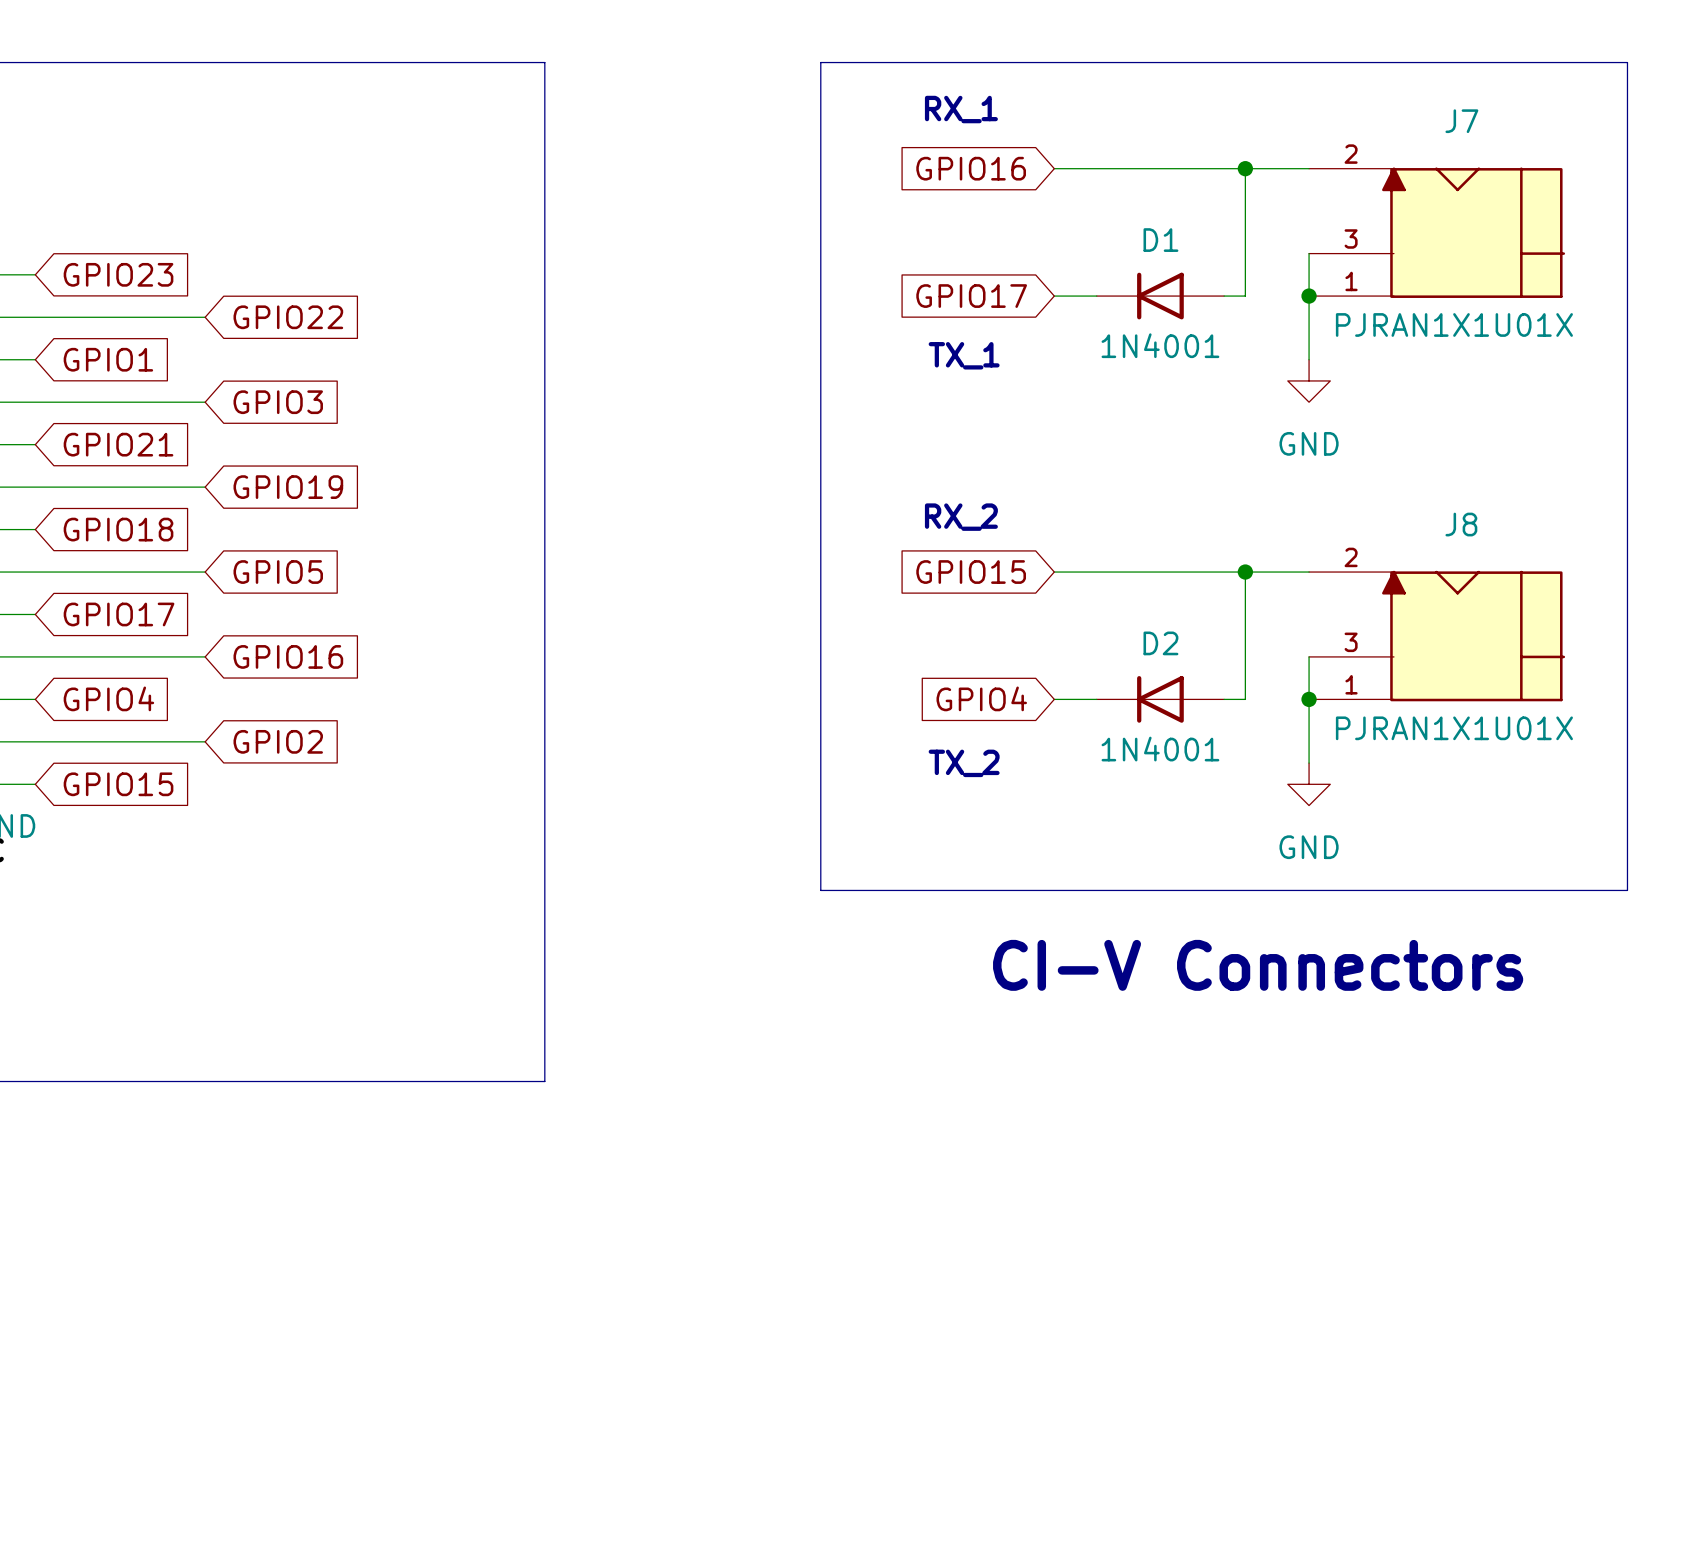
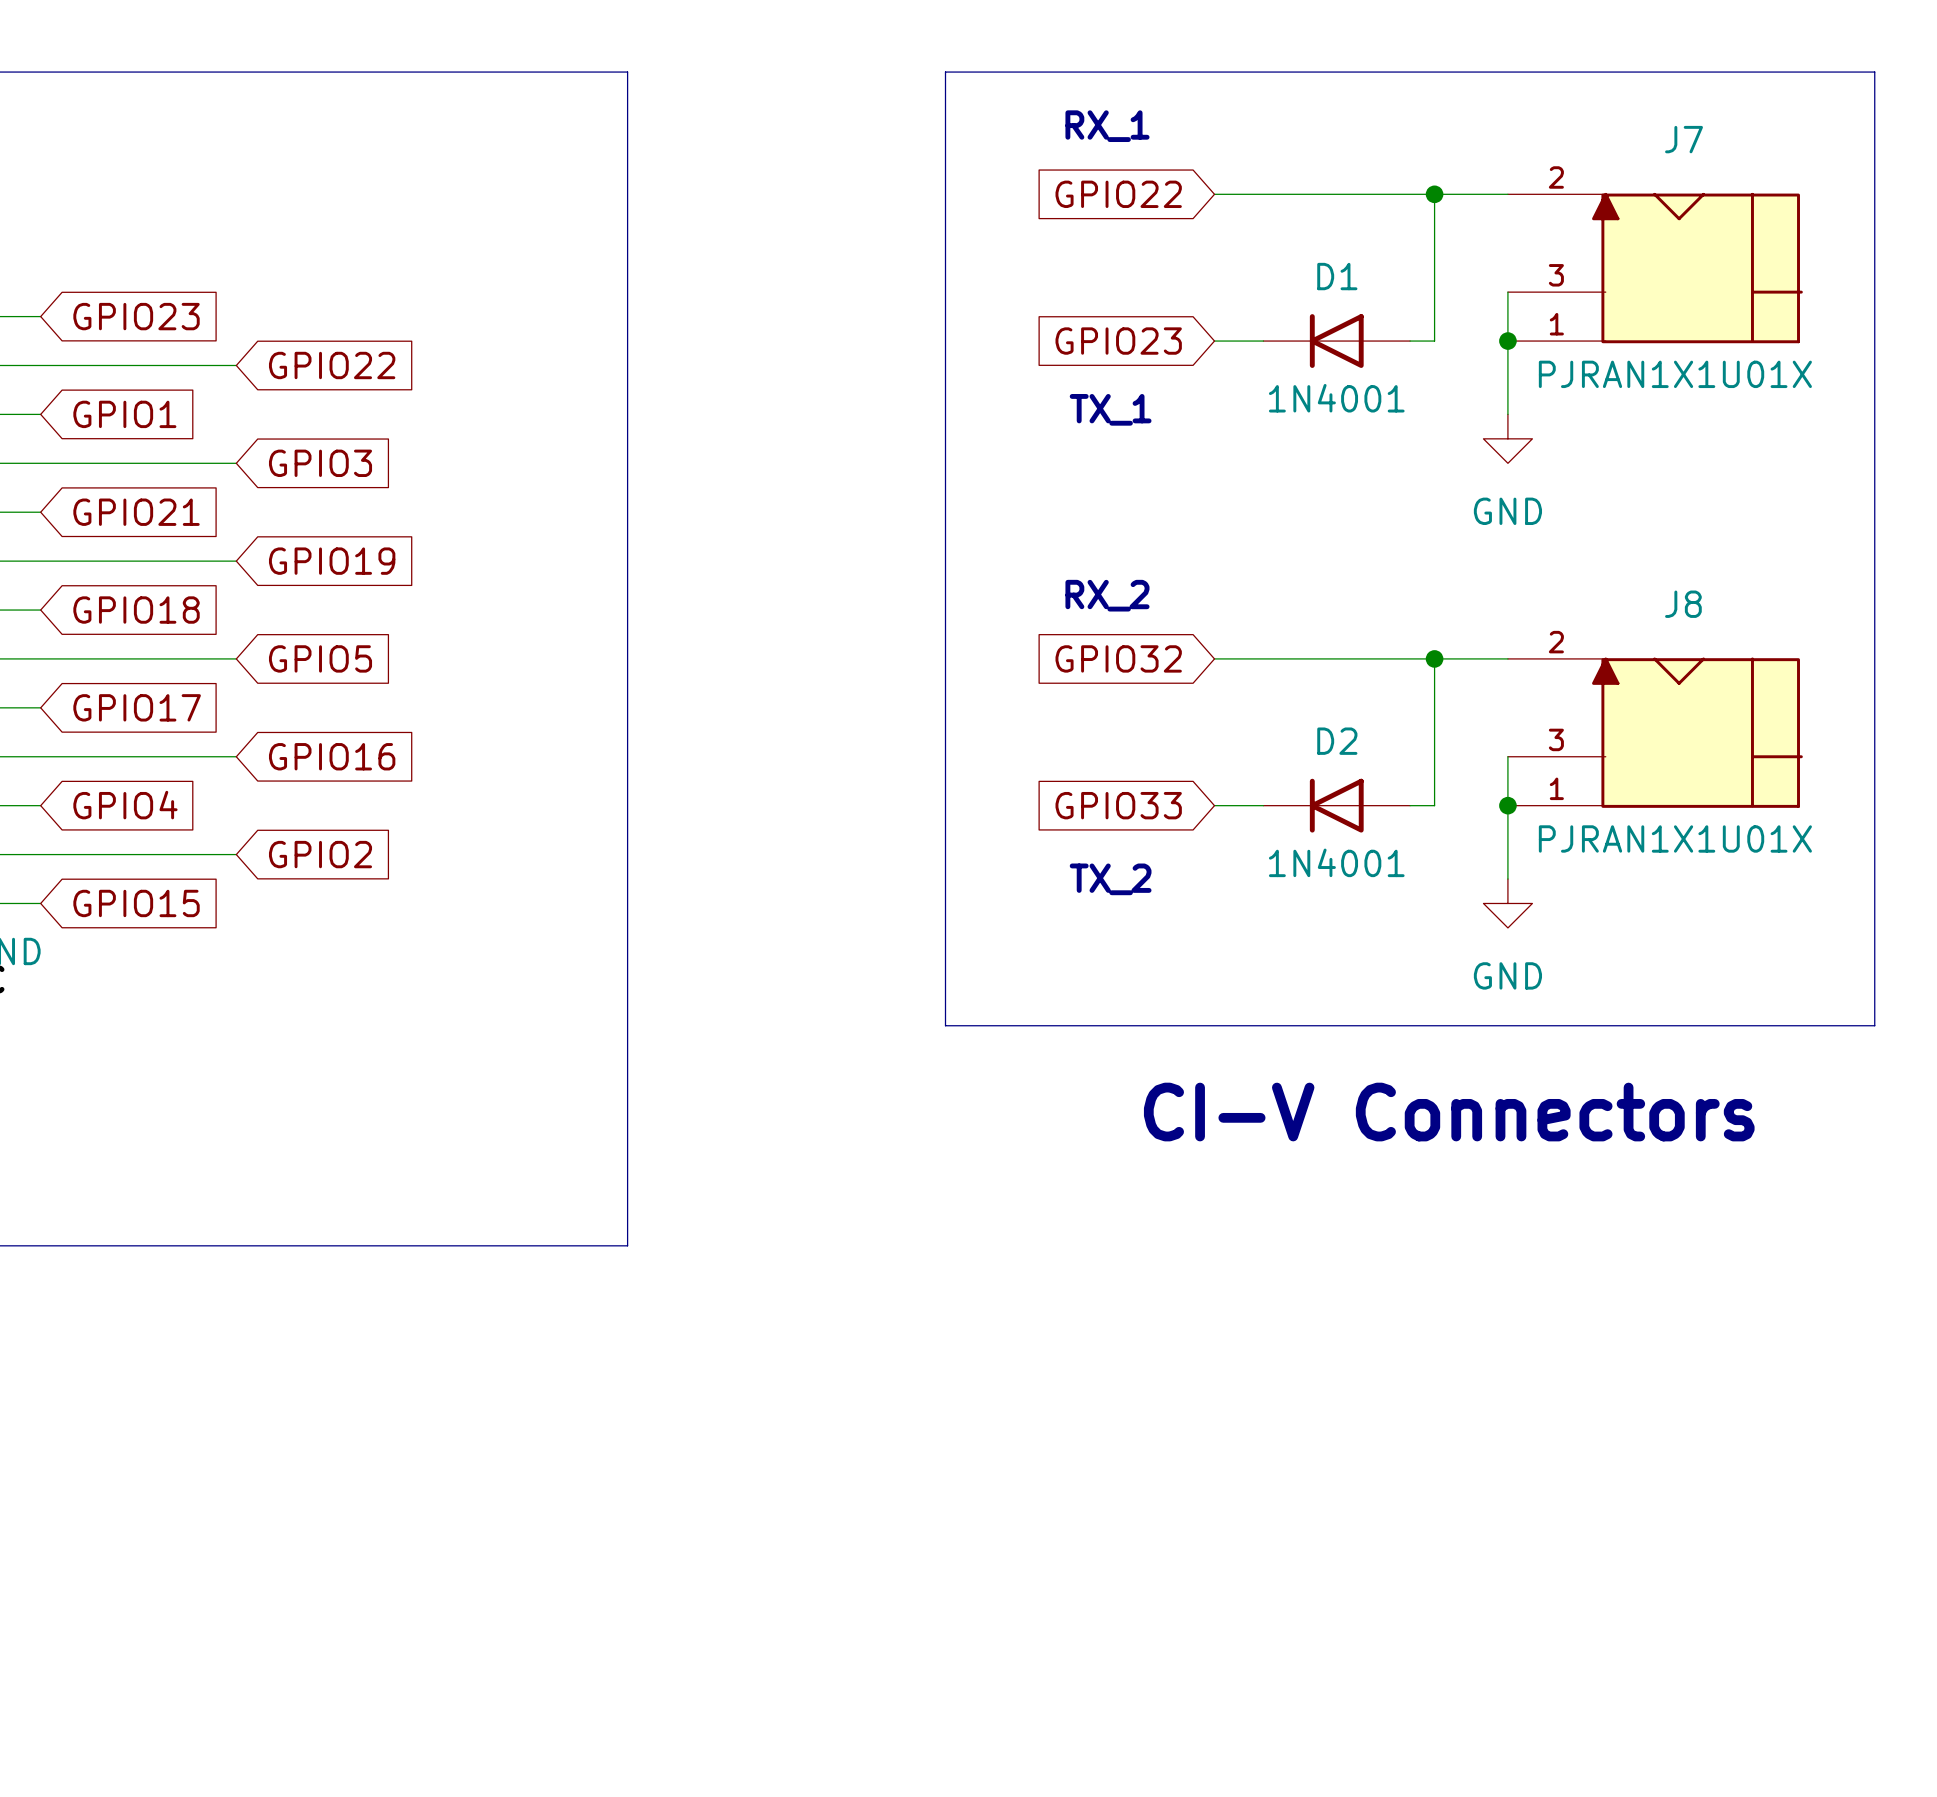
global label: GPIO16 (971, 168) -> GPIO22 (1118, 194)
global label: GPIO17 (971, 296) -> GPIO23 (1118, 341)
global label: GPIO15 (971, 572) -> GPIO32 (1118, 658)
global label: GPIO4 (981, 698) -> GPIO33 (1118, 805)

